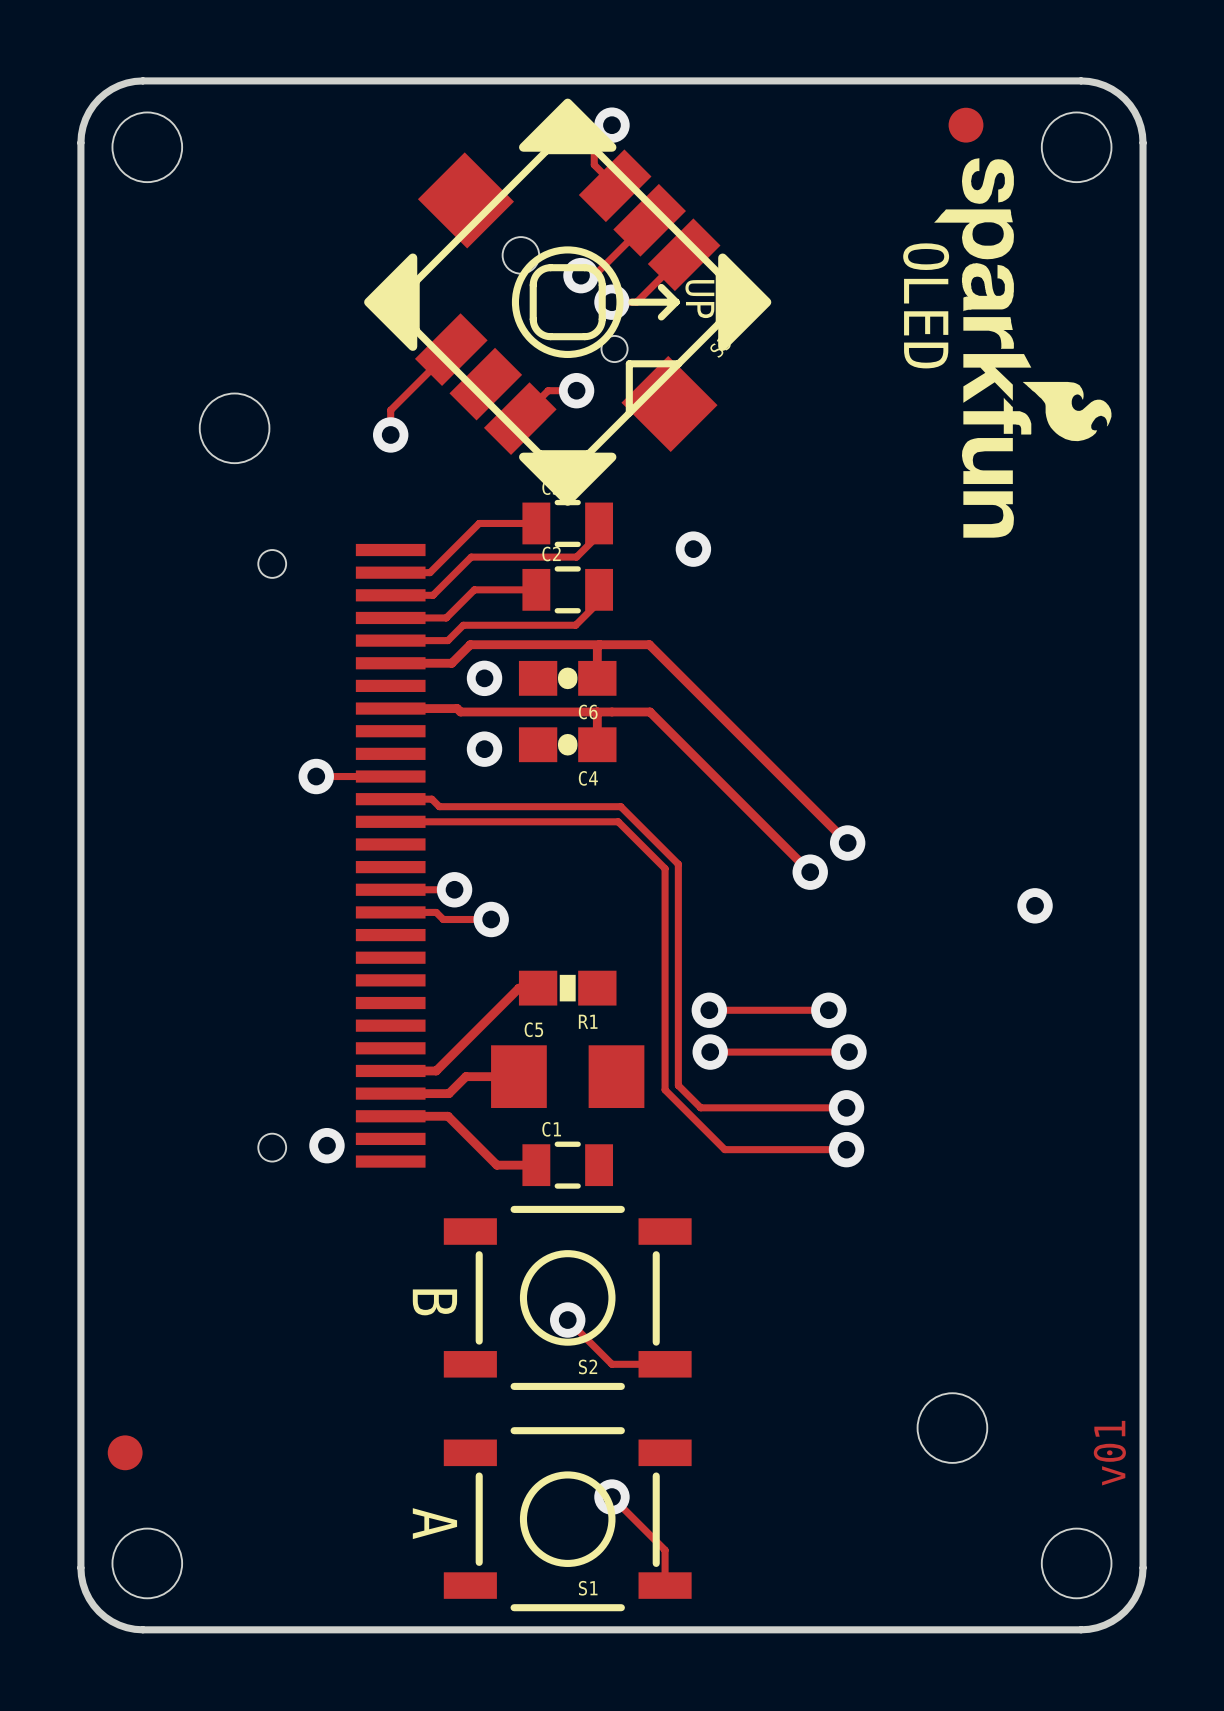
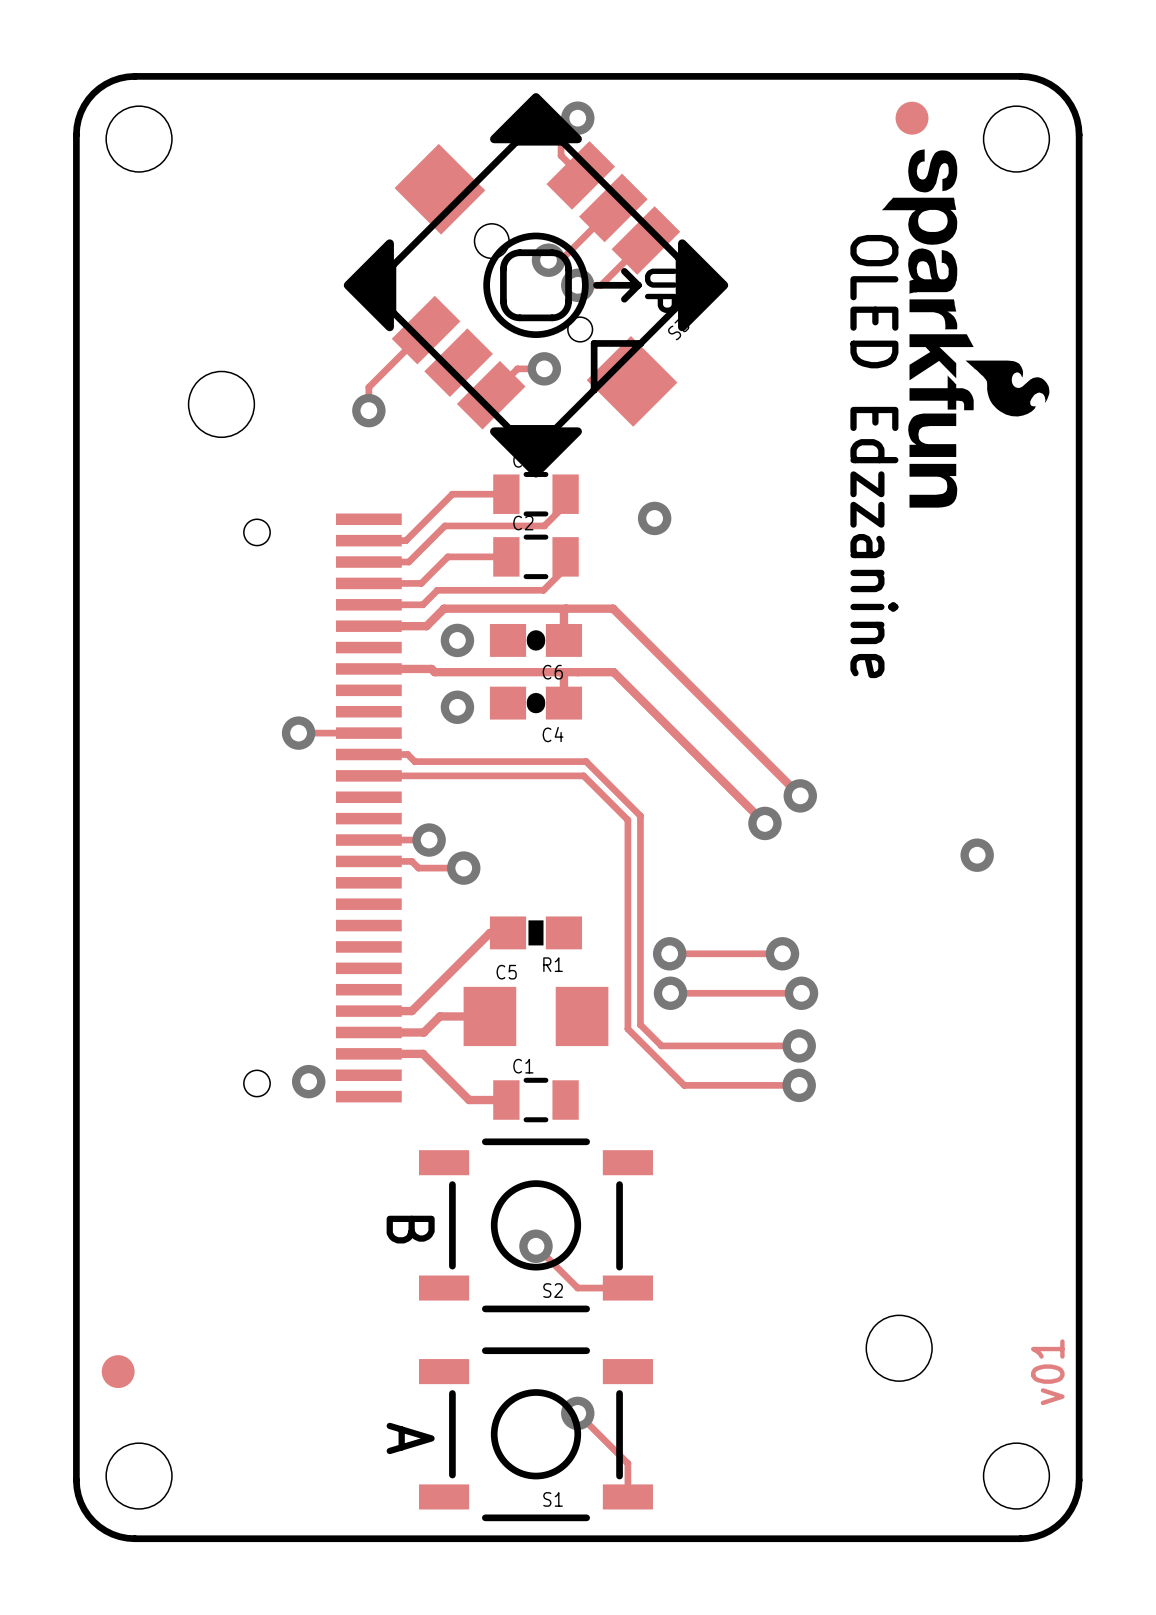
text: OLED (926, 305) -> OLED Edzzanine (874, 456)

